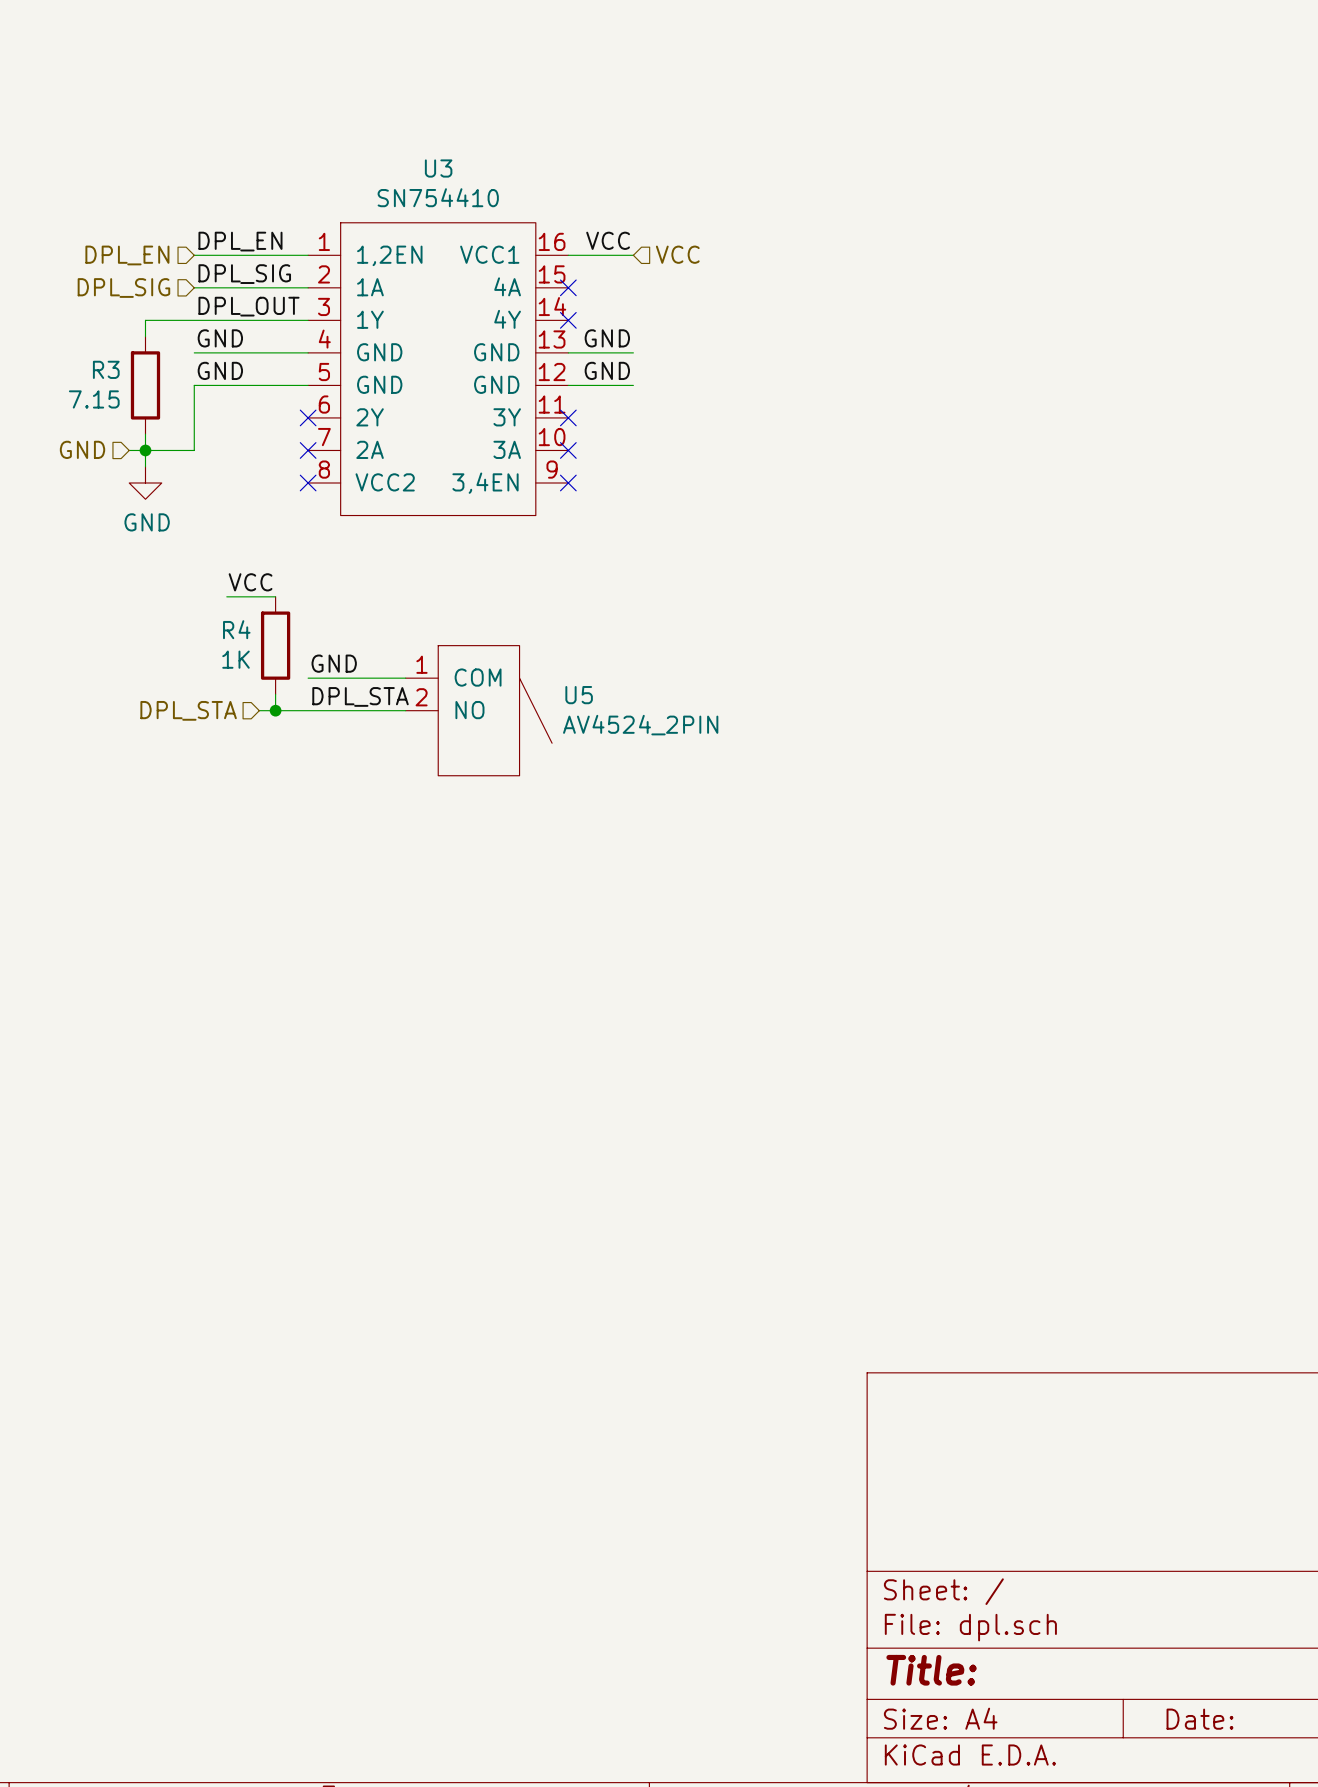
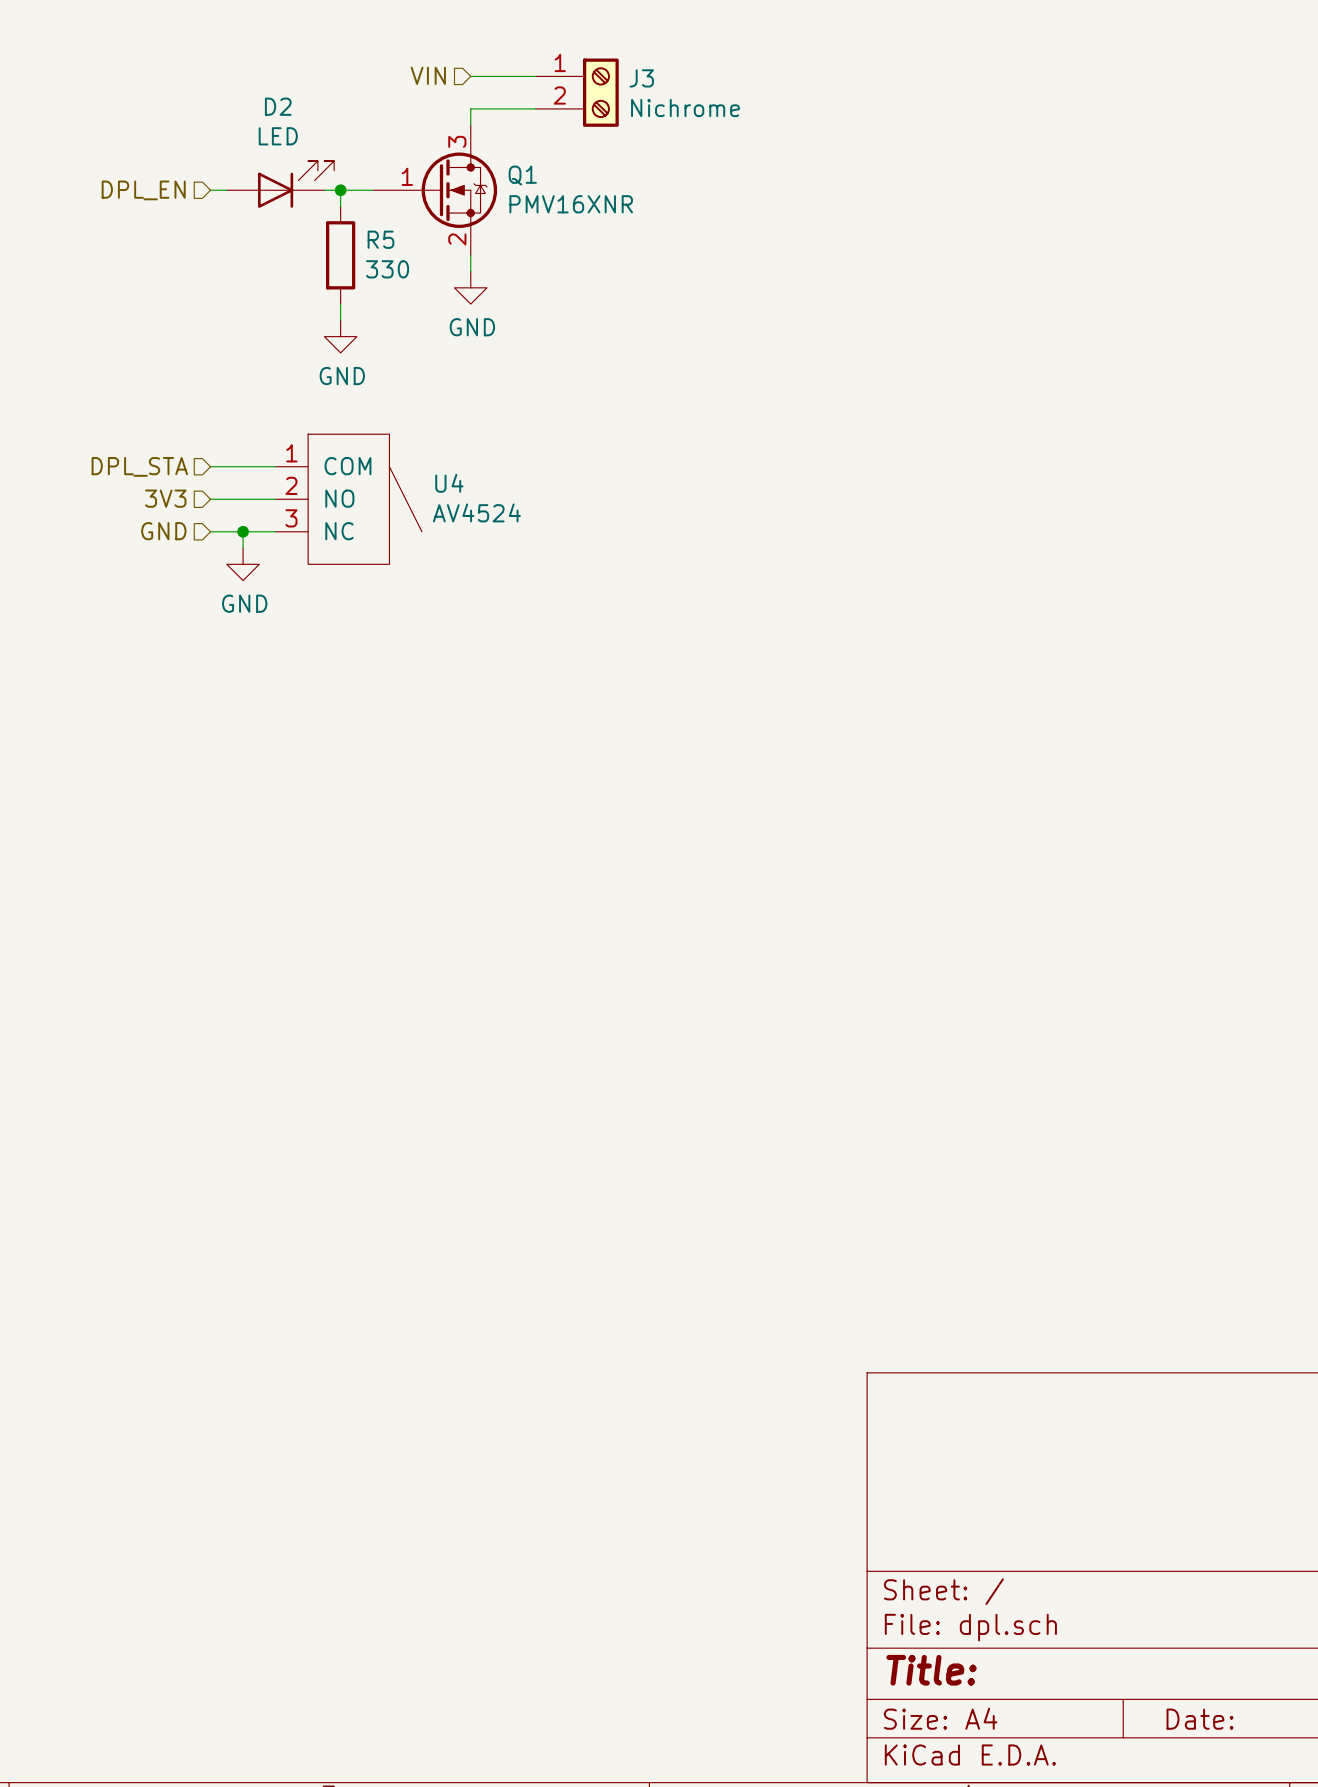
hierarchical label: none -> VIN (428, 75)
J3: none -> Nichrome (577, 92)
wire: none -> (535, 108) (470, 108) (470, 125)
D2: none -> LED (280, 184)
wire: none -> (210, 190) (226, 190)
wire: none -> (324, 190) (373, 190)
wire: none -> (340, 190) (340, 206)
junction: none -> (340, 190)
Q1: none -> PMV16XNR (435, 190)
label: VCC (608, 240) -> none
label: DPL_EN (240, 241) -> none
hierarchical label: VCC (677, 254) -> none
hierarchical label position: DPL_EN (127, 255) -> DPL_EN (143, 190)
wire: (194, 255) (308, 255) -> none
R5: none -> 330 (340, 255)
wire: none -> (470, 255) (470, 271)
wire: (568, 255) (633, 255) -> (470, 76) (535, 76)
label: DPL_SIG (244, 274) -> none
wire: (194, 287) (308, 287) -> none
power symbol: none -> GND (470, 287)
no-connect mark: (568, 287) -> none
hierarchical label: DPL_SIG (123, 288) -> none
label: DPL_OUT (249, 306) -> none
wire: (308, 320) (145, 320) (145, 336) -> none
no-connect mark: (568, 320) -> none
power symbol: none -> GND (340, 336)
label: GND (220, 338) -> none
label: GND (607, 338) -> none
wire: (194, 352) (308, 352) -> none
wire: (568, 352) (633, 352) -> none
U3: SN754410 (438, 369) -> none
label: GND (220, 370) -> none
label: GND (607, 370) -> none
R3: 7.15 (145, 385) -> none
wire: (308, 385) (194, 385) (194, 450) (129, 450) -> none
wire: (568, 385) (633, 385) -> none
no-connect mark: (308, 417) -> none
no-connect mark: (568, 417) -> none
wire: (145, 434) (145, 466) -> none
hierarchical label position: GND (82, 449) -> GND (163, 531)
junction: (145, 450) -> none
no-connect mark: (308, 450) -> none
no-connect mark: (568, 450) -> none
wire: none -> (210, 466) (275, 466)
power symbol: GND (145, 483) -> none
no-connect mark: (308, 483) -> none
no-connect mark: (568, 483) -> none
hierarchical label: none -> 3V3 (165, 498)
wire: none -> (210, 499) (275, 499)
U4: none -> AV4524 (348, 499)
wire: none -> (210, 531) (275, 531)
junction: none -> (243, 531)
power symbol: none -> GND (243, 564)
label: VCC (250, 582) -> none
wire: (226, 596) (275, 596) -> none
R4: 1K (275, 645) -> none
label: GND (334, 663) -> none
wire: (308, 678) (405, 678) -> none
wire: (275, 694) (275, 710) -> (243, 531) (243, 548)
label: DPL_STA (360, 696) -> none
hierarchical label position: DPL_STA (188, 710) -> DPL_STA (139, 466)
wire: (259, 710) (405, 710) -> none
junction: (275, 710) -> none
U5: AV4524_2PIN (478, 710) -> none

